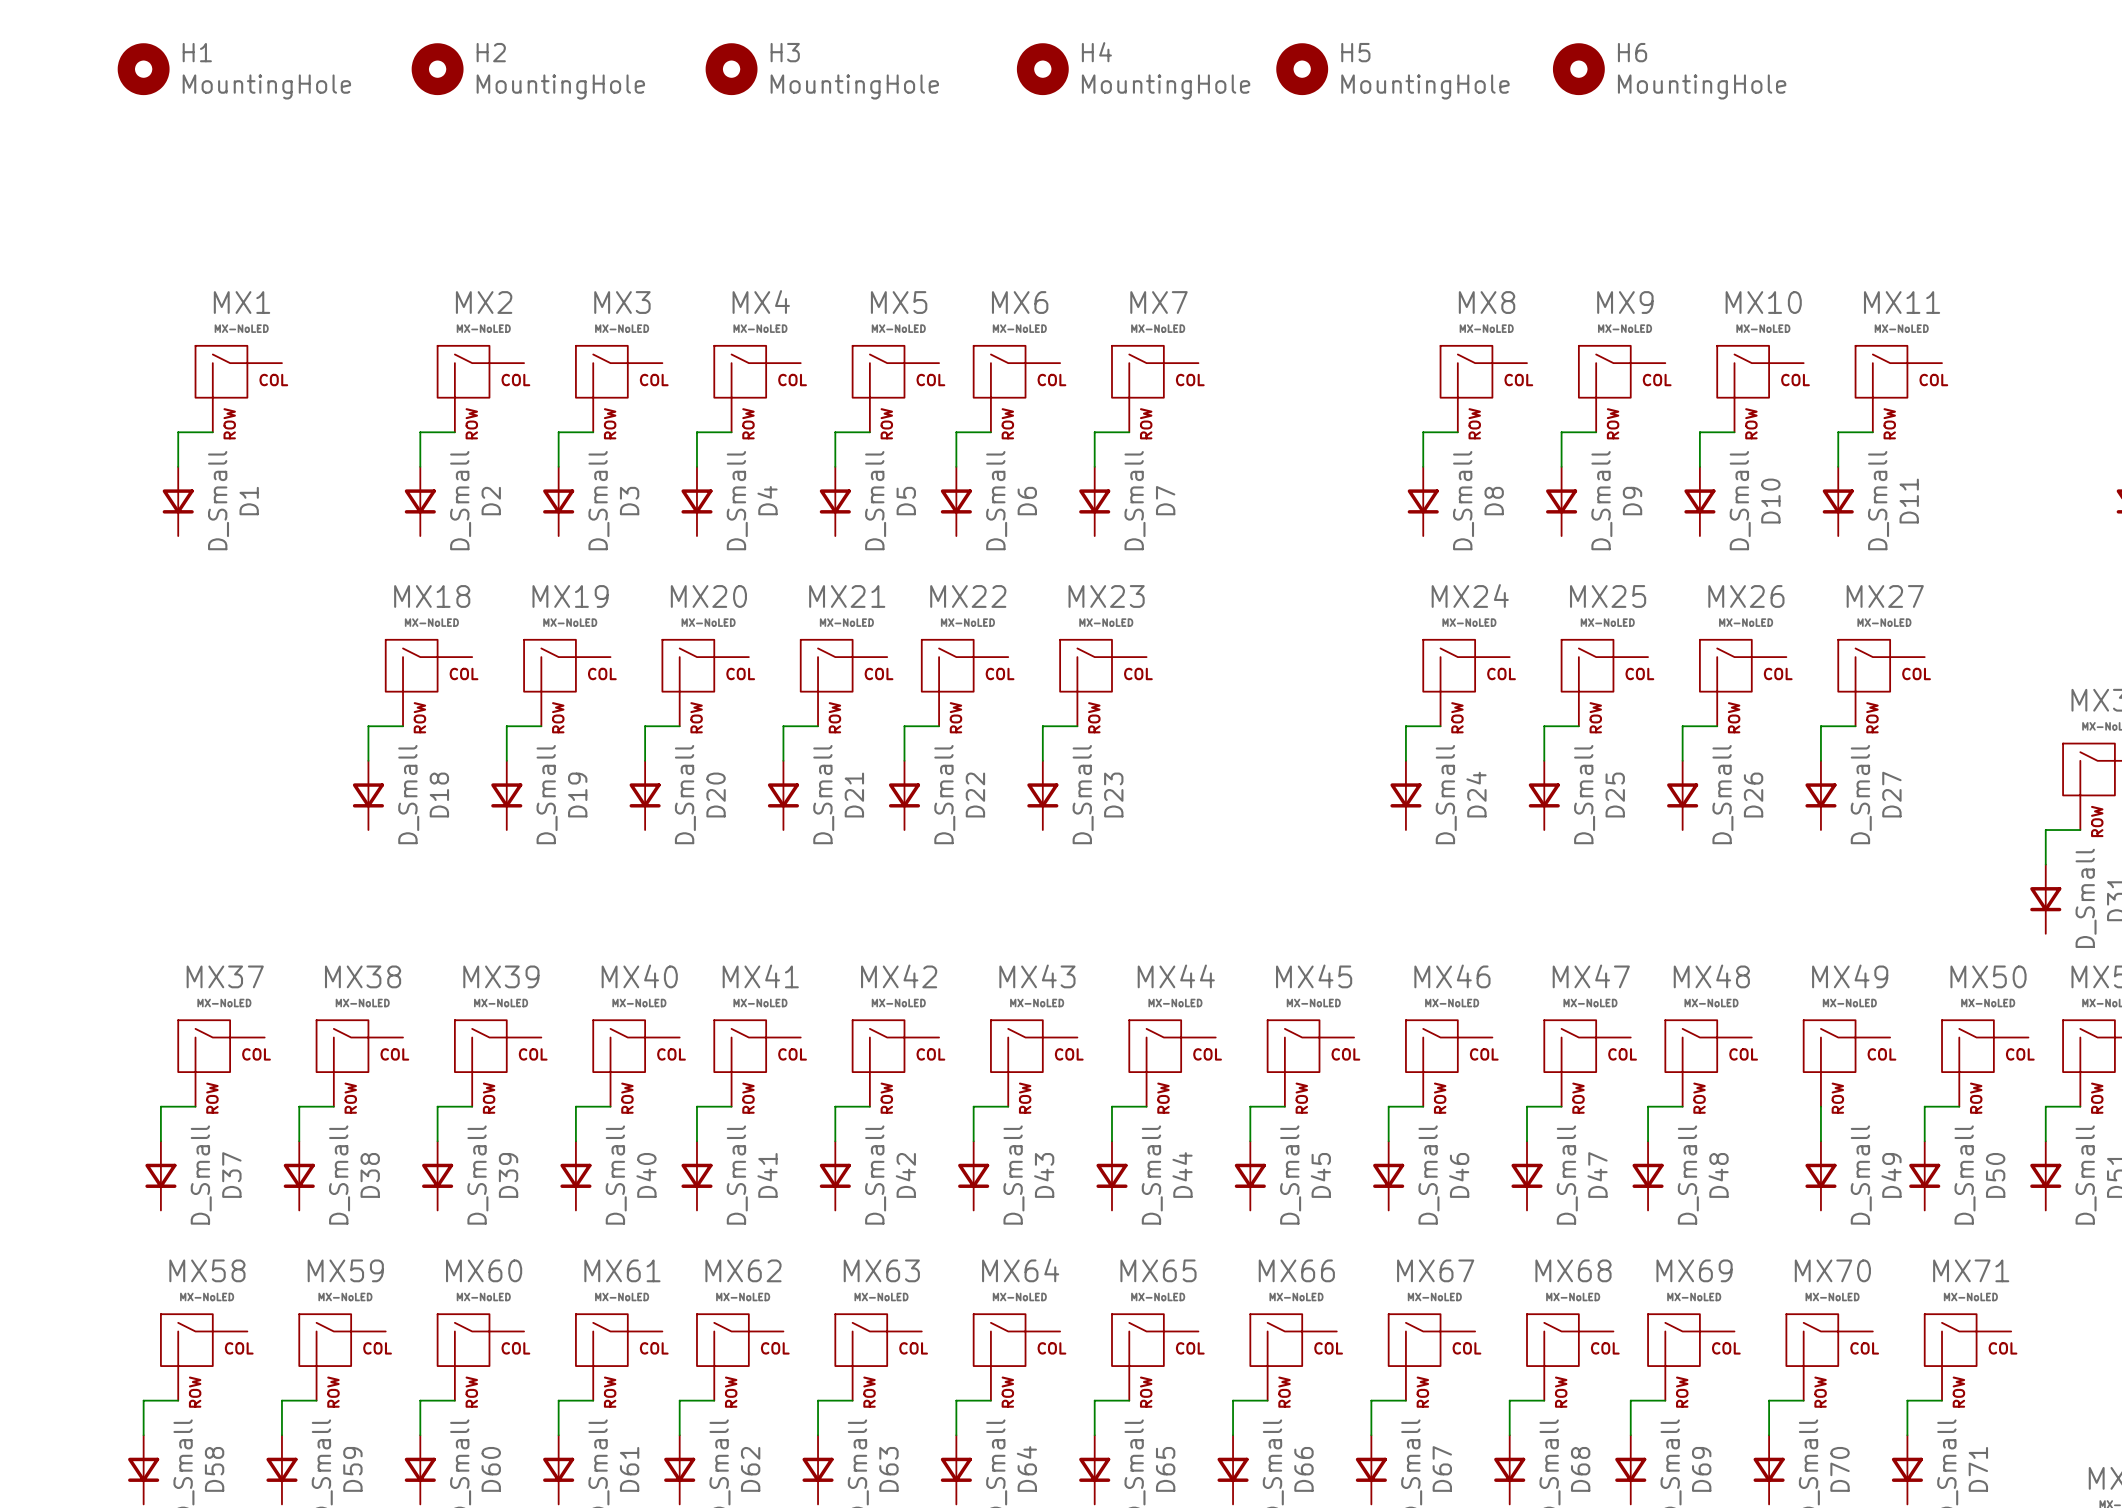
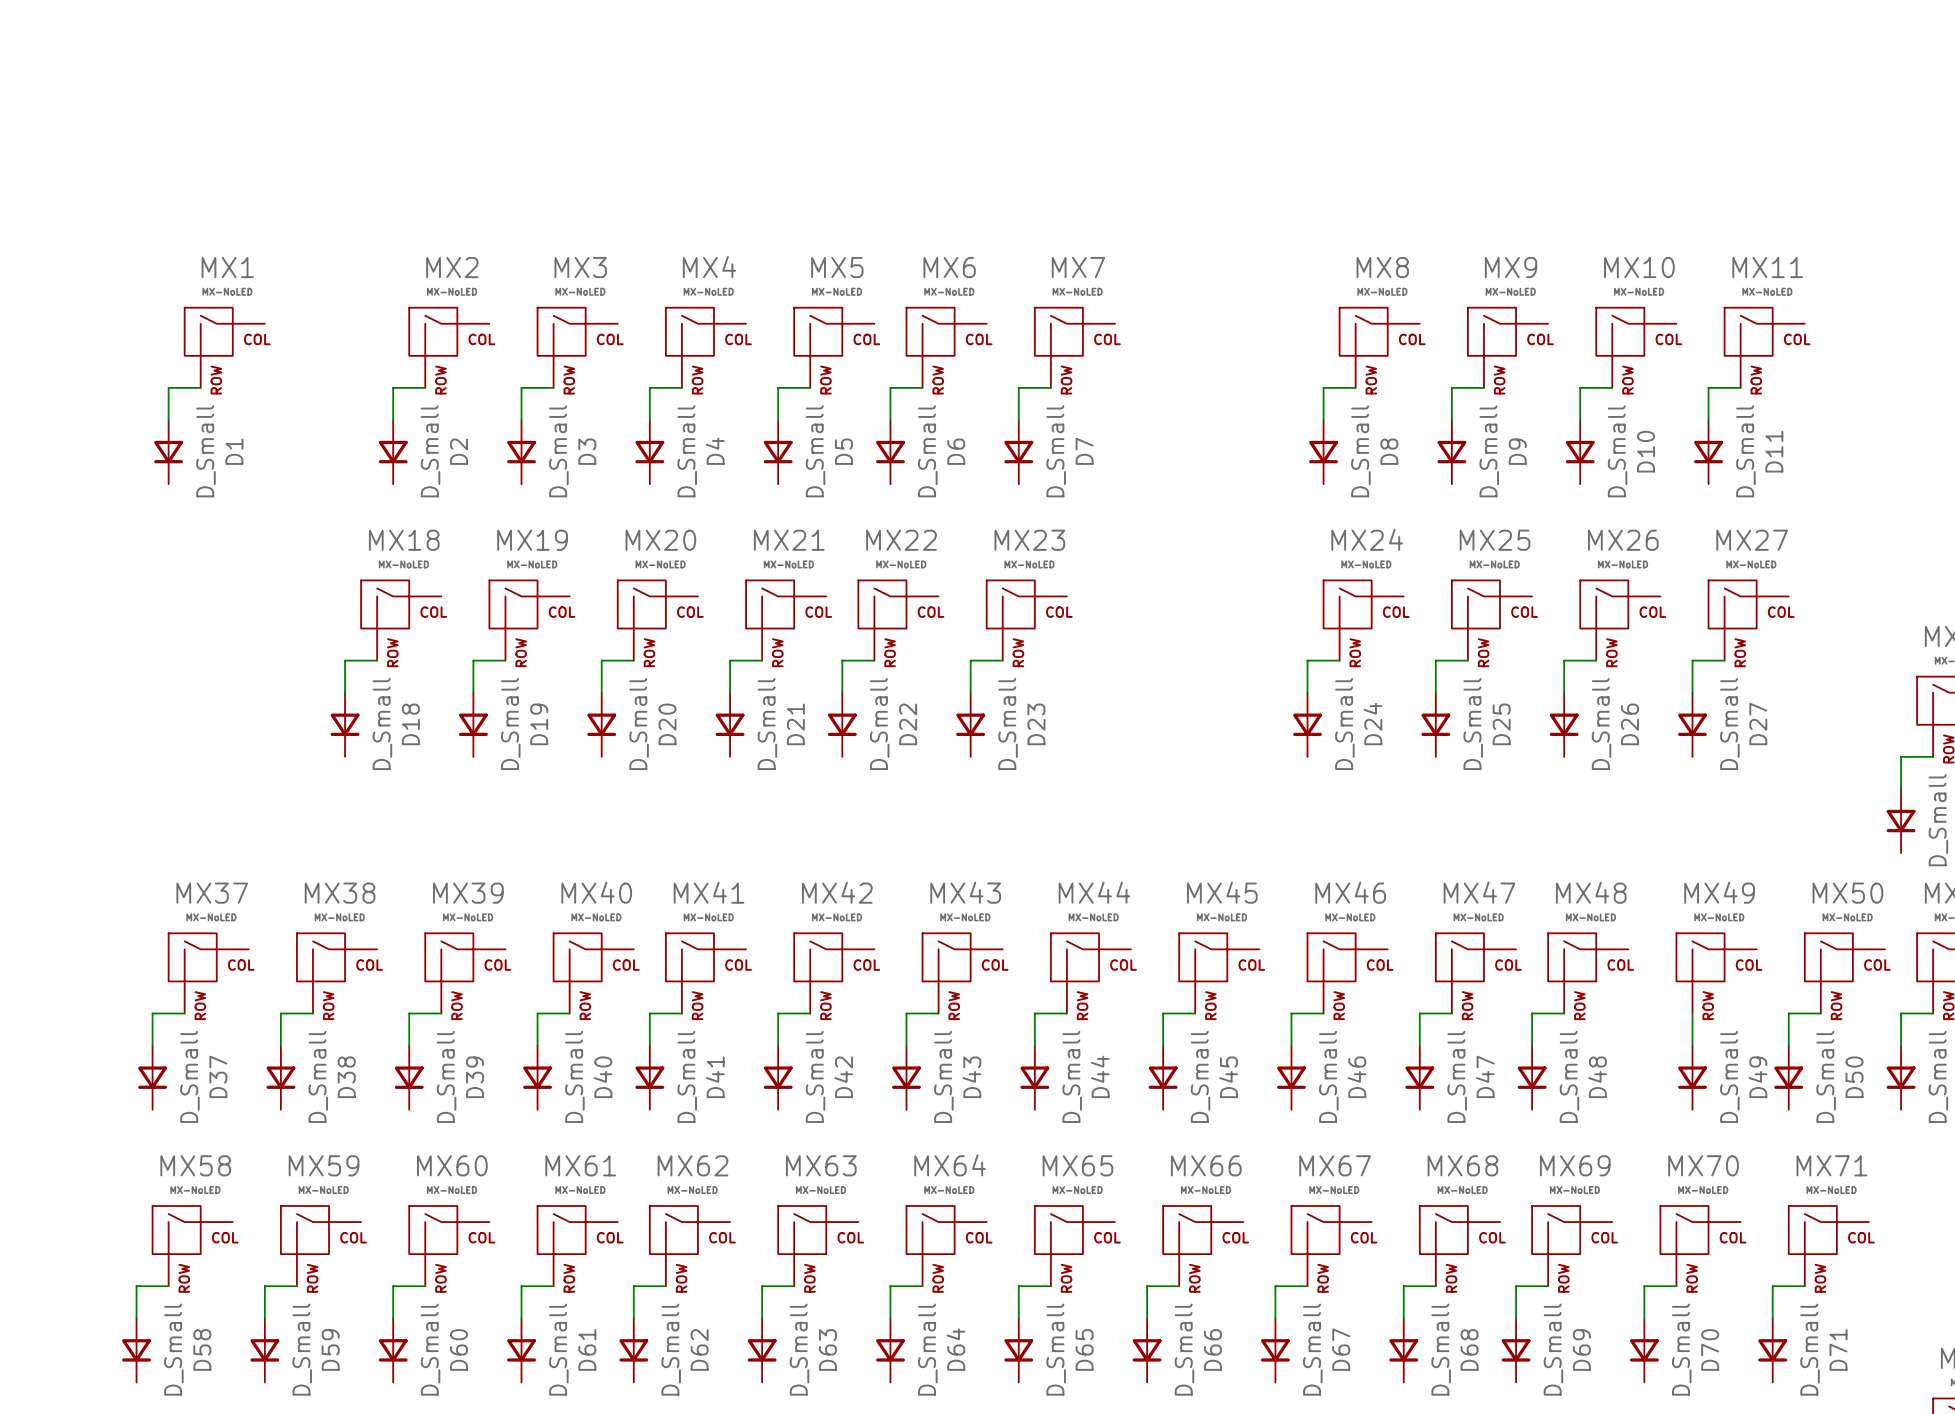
H1: MountingHole (143, 69) -> none
H2: MountingHole (437, 69) -> none
H3: MountingHole (731, 69) -> none
H4: MountingHole (1042, 69) -> none
H5: MountingHole (1302, 69) -> none
H6: MountingHole (1578, 69) -> none

